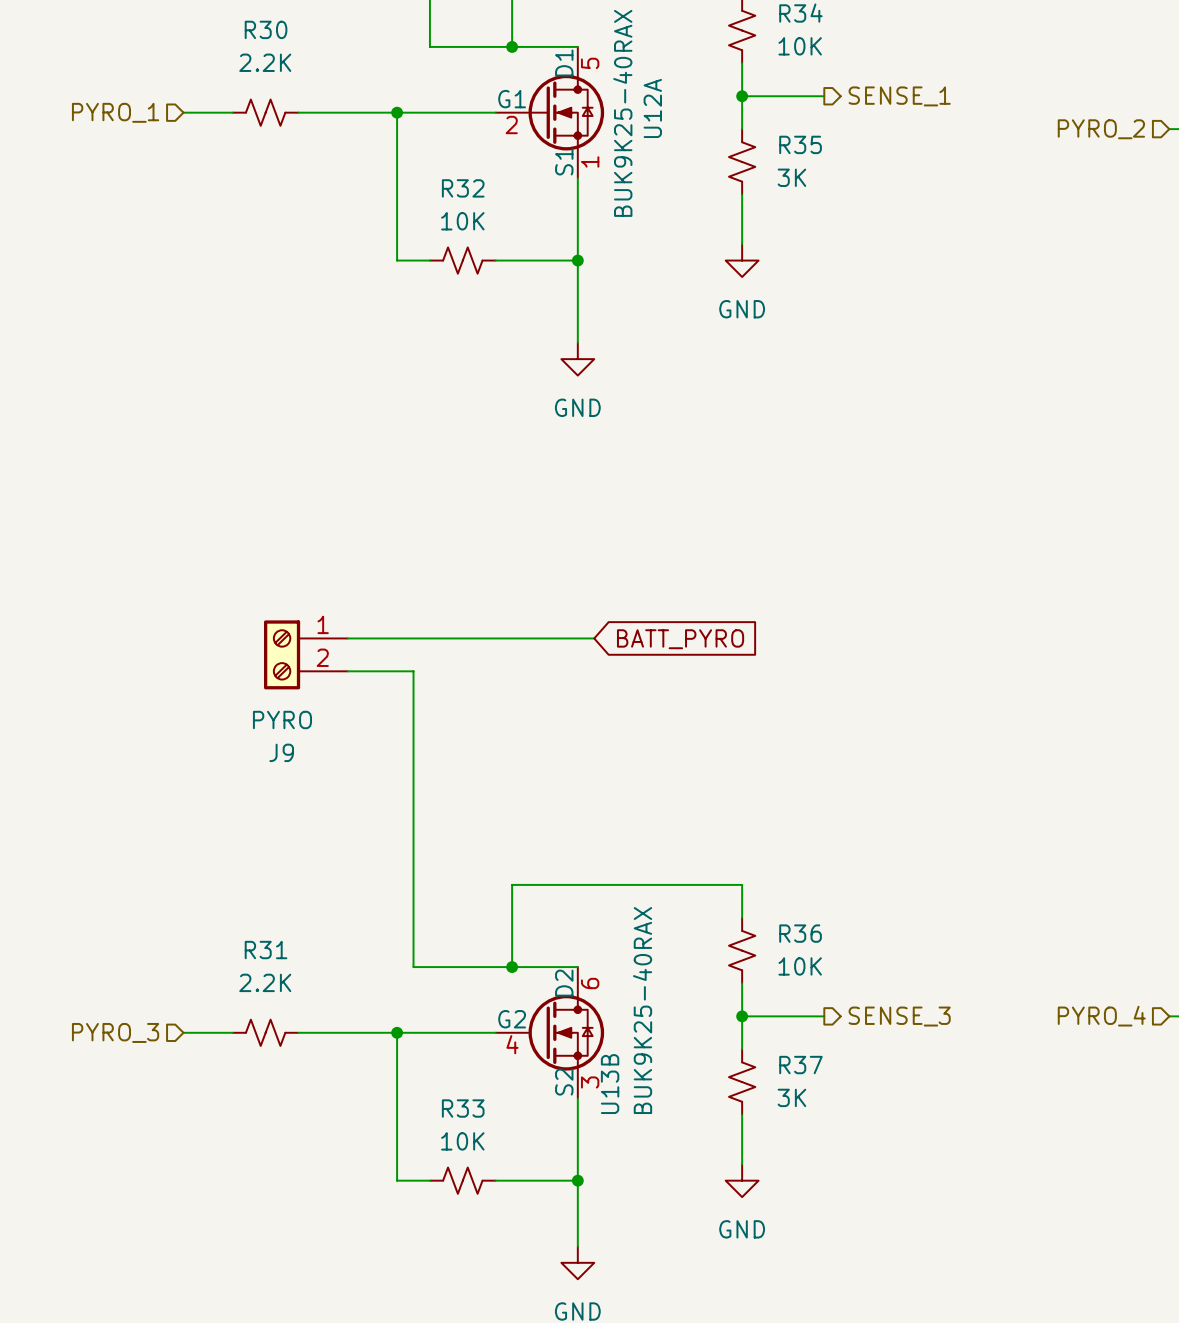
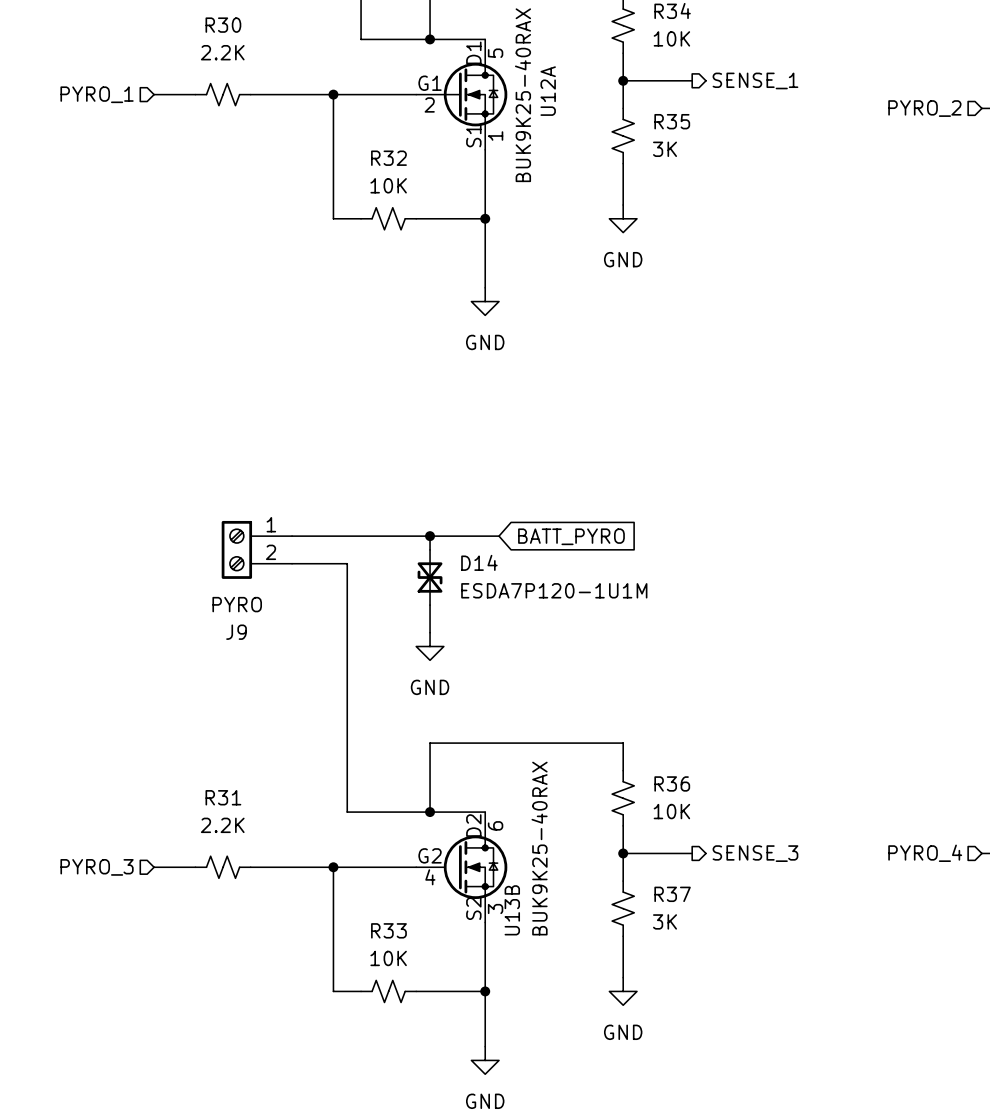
wire: none -> (430, 536) (430, 549)
junction: none -> (430, 536)
D14: none -> ESDA7P120-1U1M (430, 577)
wire: none -> (430, 605) (430, 632)
power symbol: none -> GND (430, 646)

